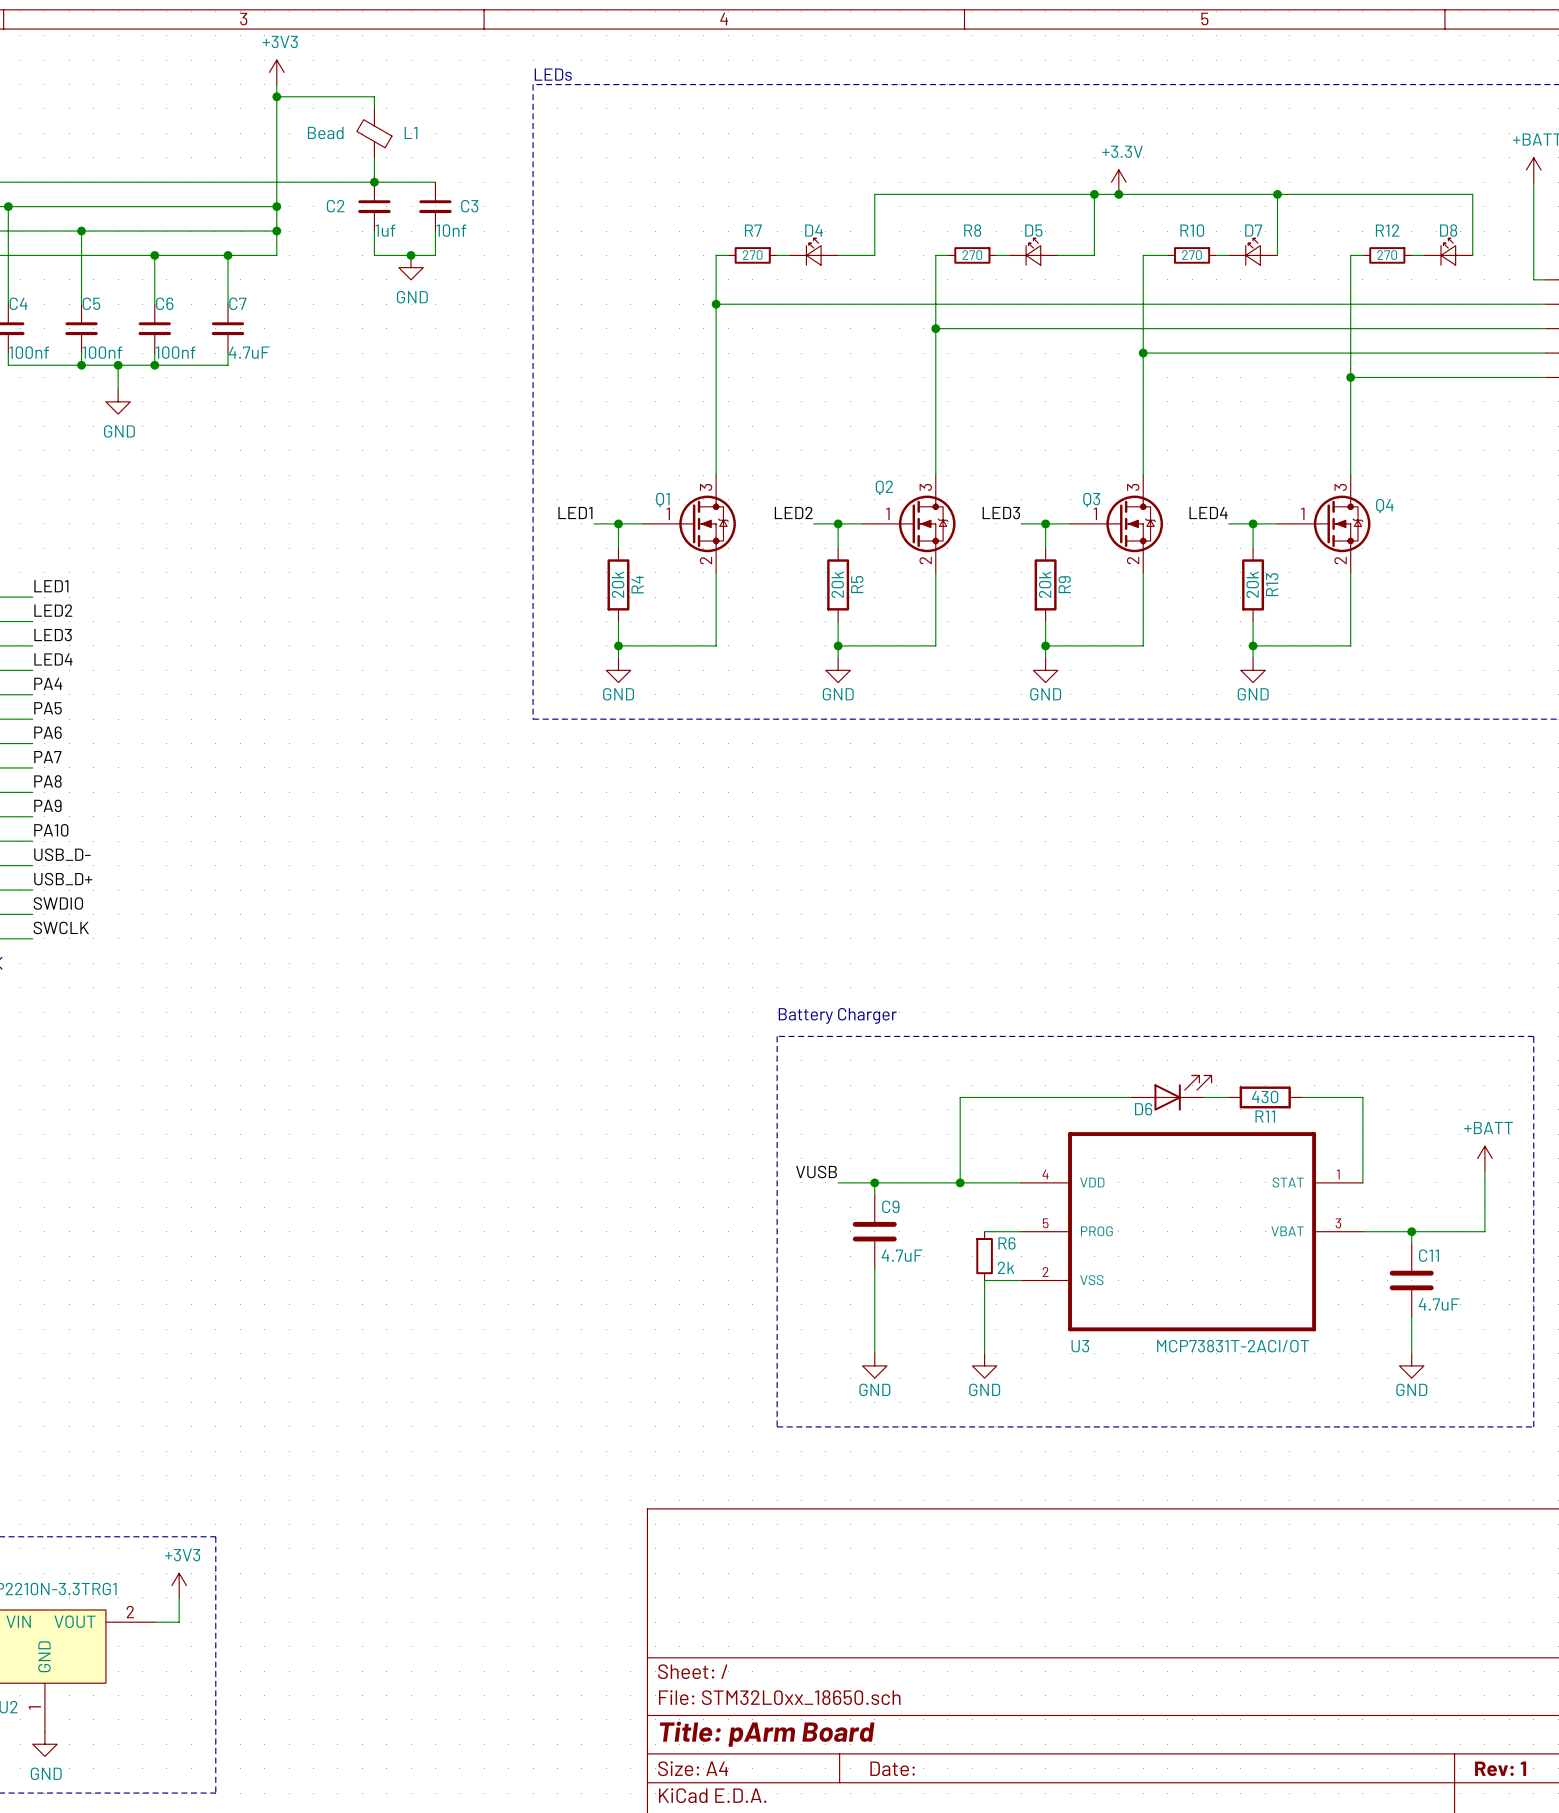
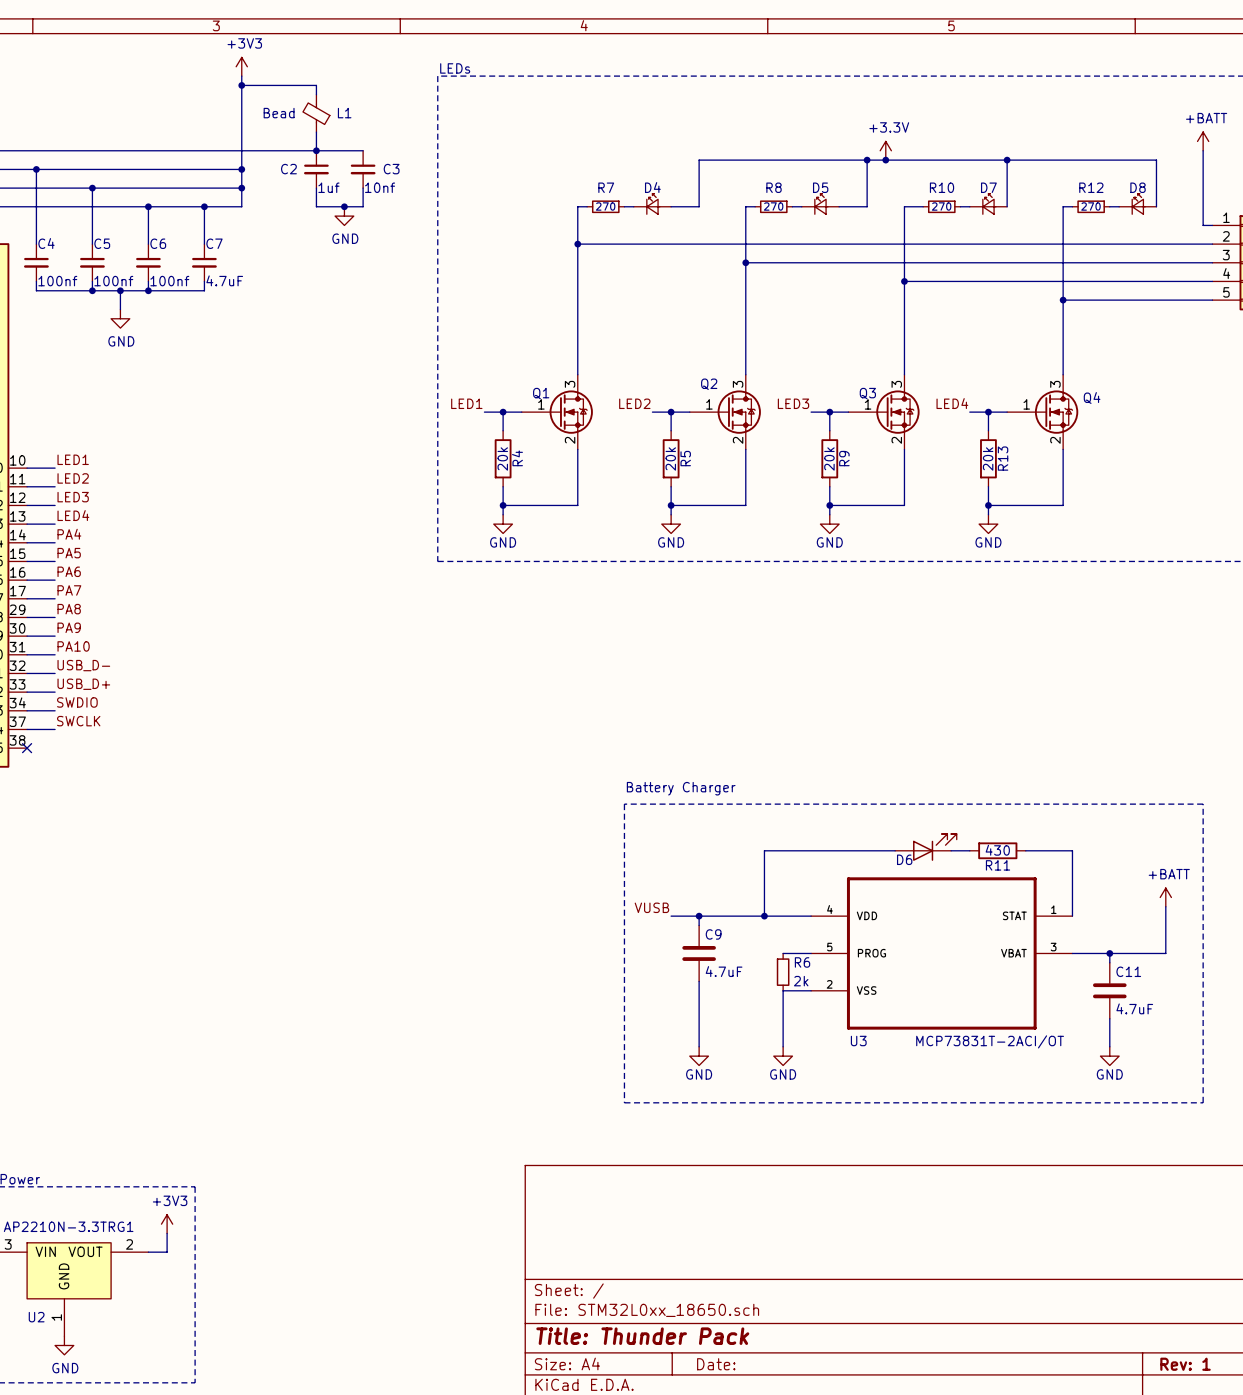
title block: Title: pArm Board (767, 1734) -> Title: Thunder Pack (642, 1336)

